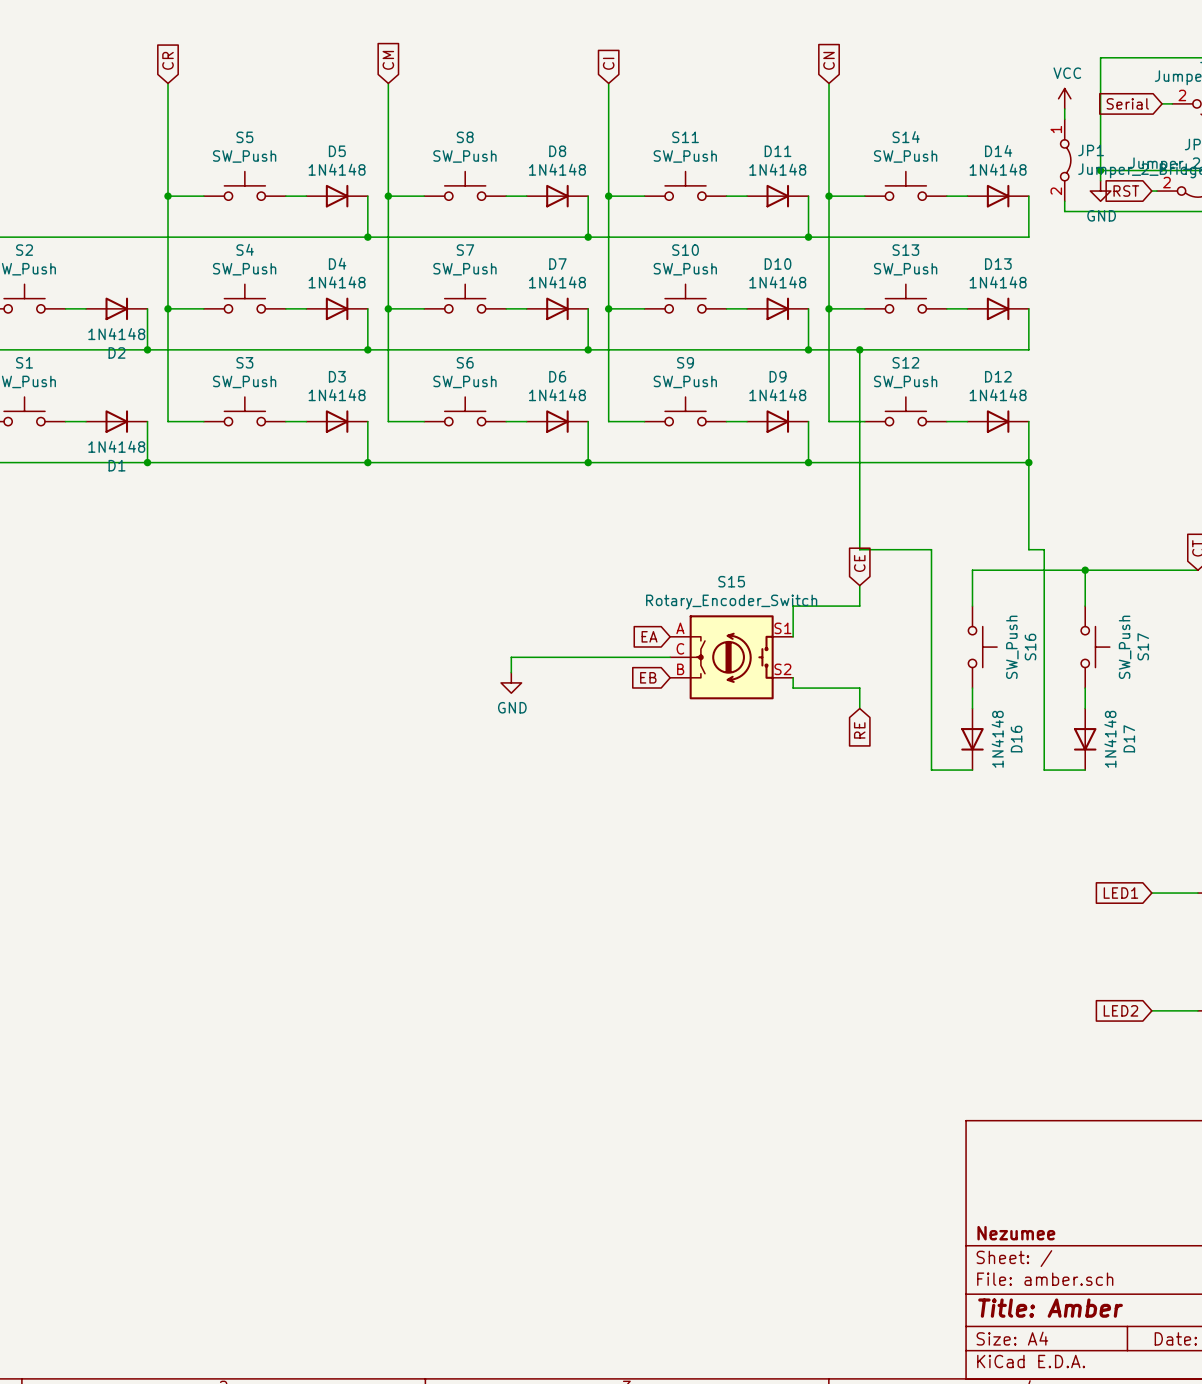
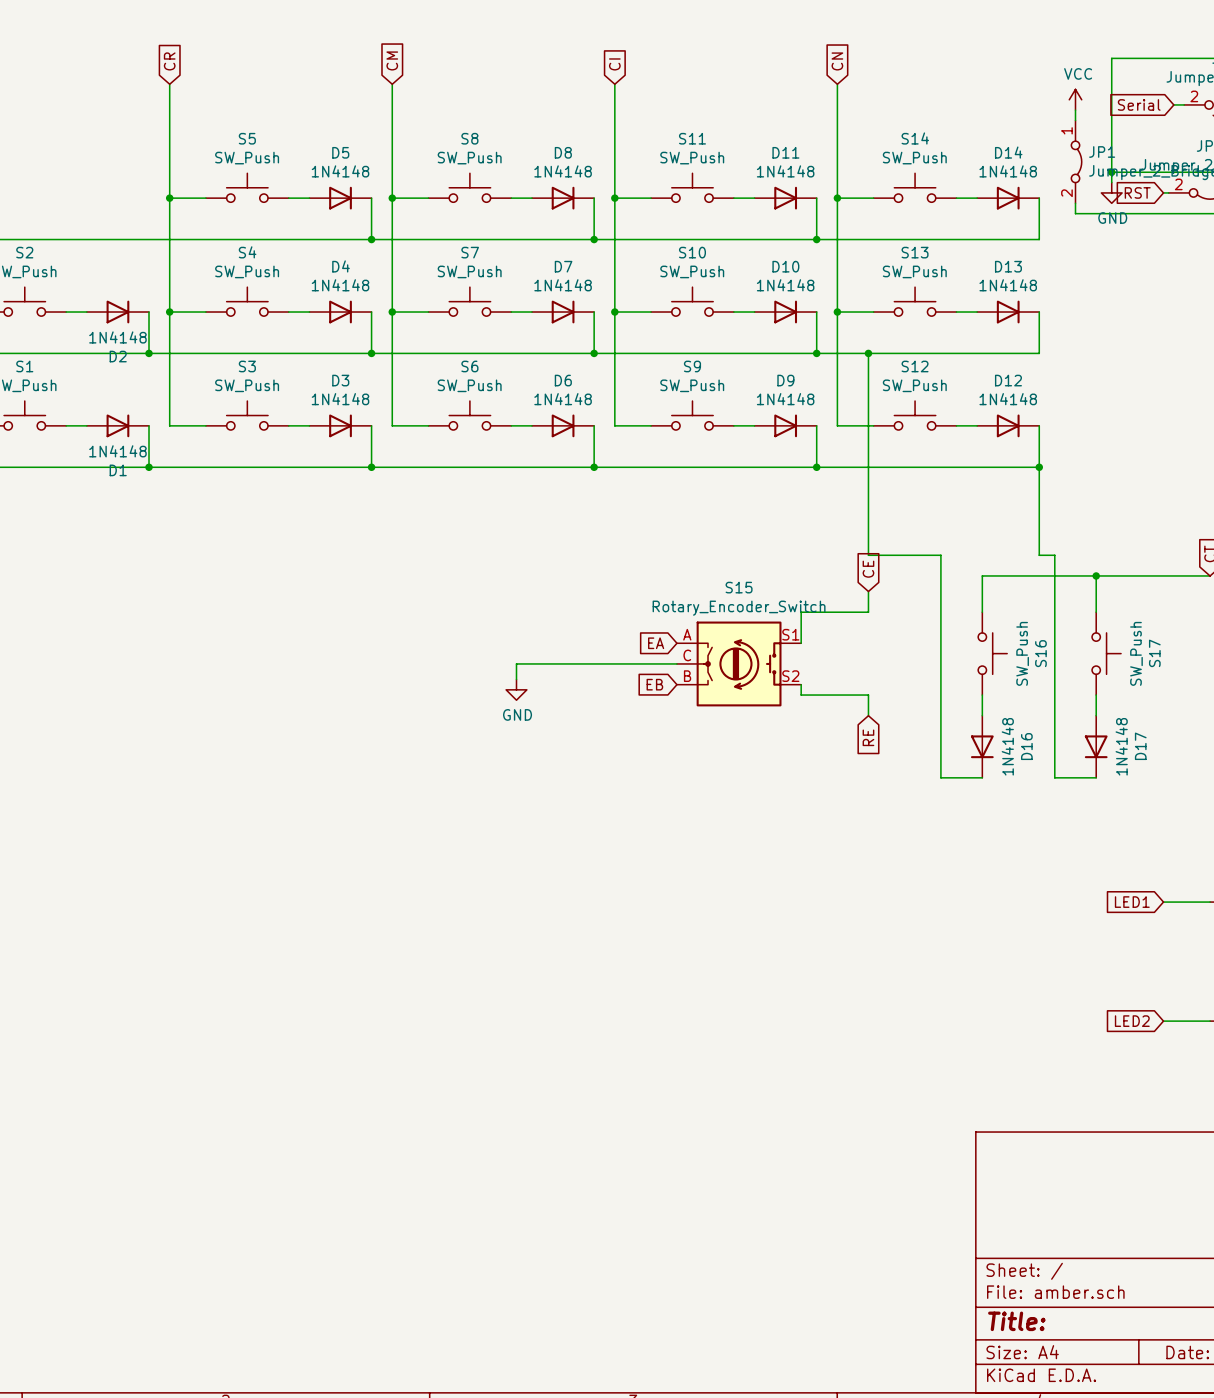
title block: Nezumee (1016, 1233) -> none
title block: Title: Amber (1050, 1308) -> Title: (1016, 1321)

